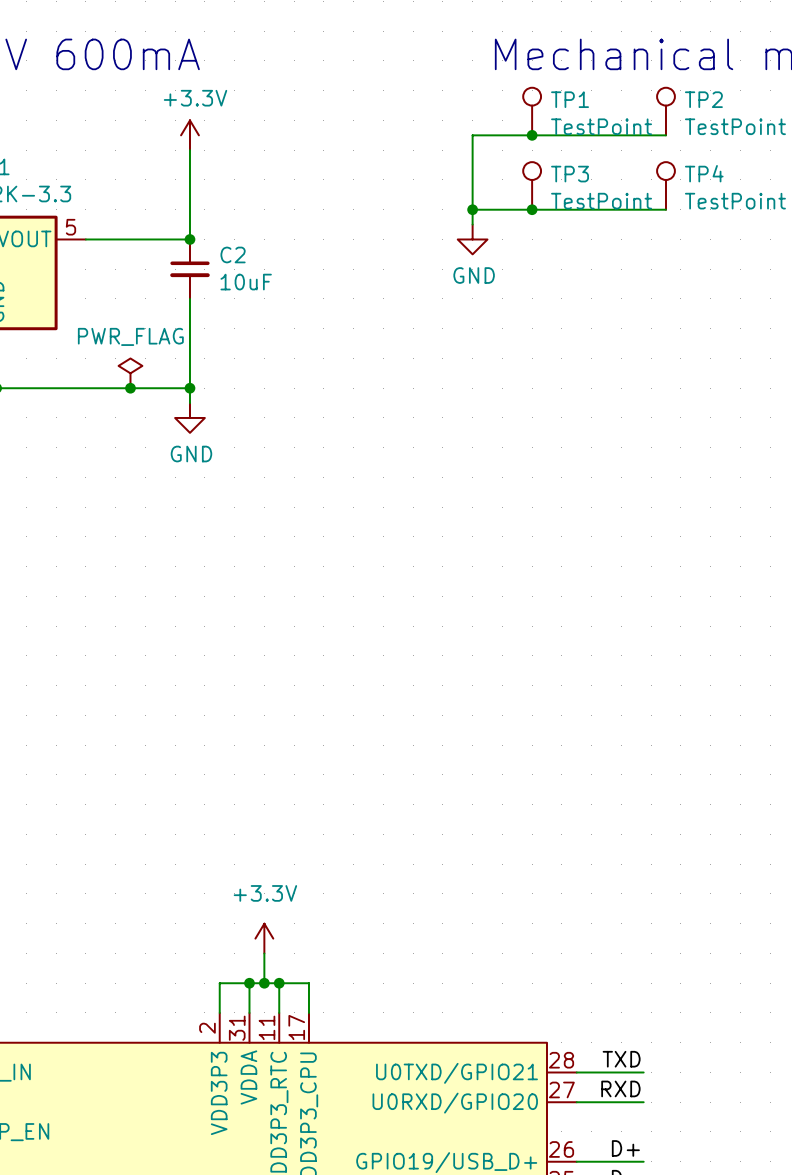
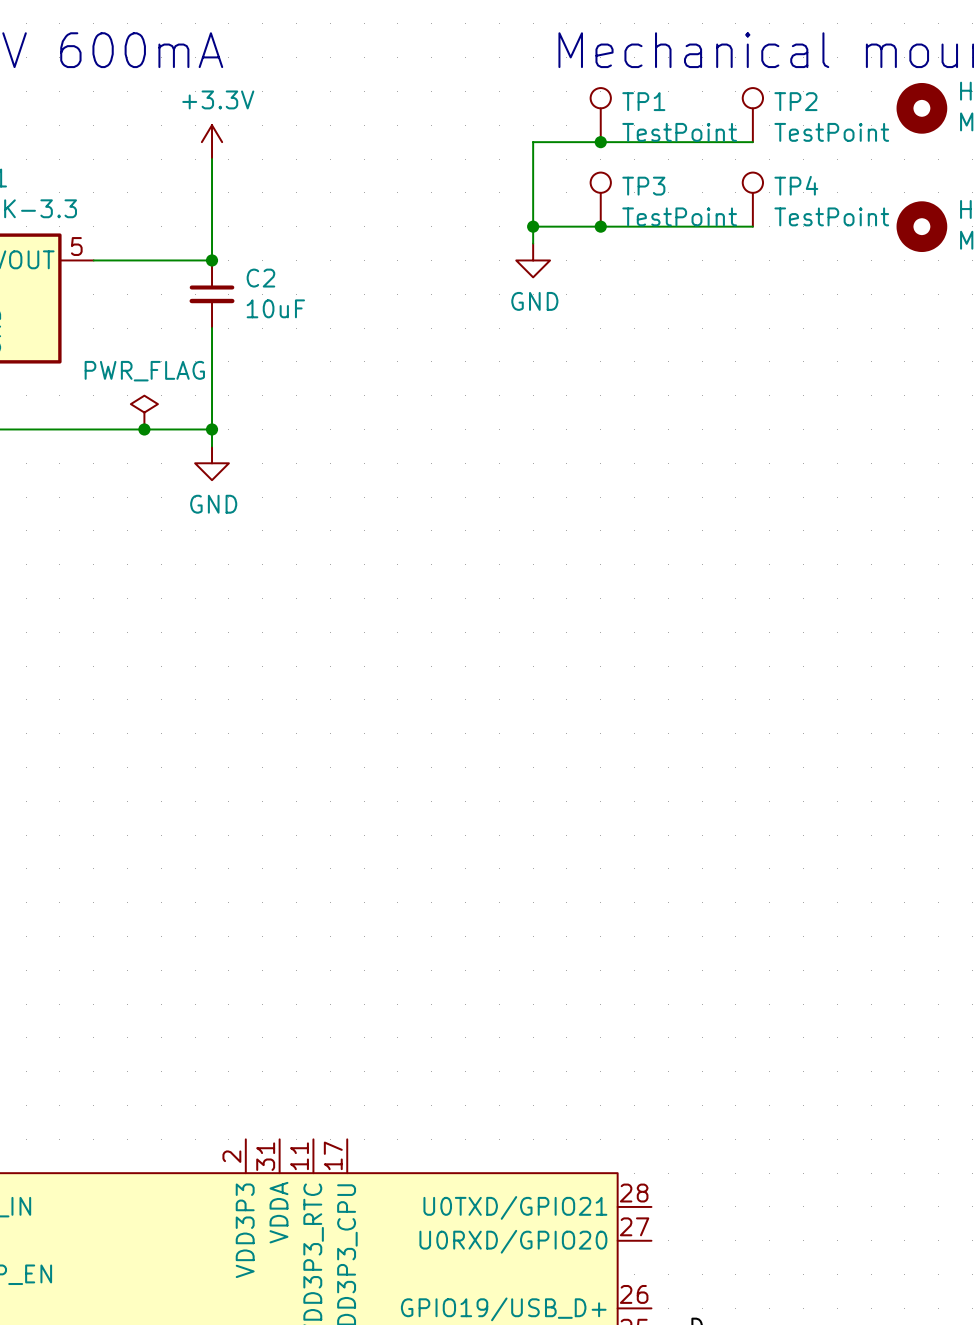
power symbol: +3.3V (264, 938) -> none
wire: (264, 953) (264, 983) -> none
wire: (249, 983) (249, 1012) -> none
junction: (249, 983) -> none
junction: (264, 983) -> none
wire: (279, 983) (279, 1012) -> none
junction: (279, 983) -> none
wire: (219, 1012) (219, 983) (308, 983) (308, 1012) -> none
label: TXD (621, 1059) -> none
wire: (576, 1072) (643, 1072) -> none
label: RXD (620, 1088) -> none
wire: (576, 1102) (643, 1102) -> none
label: D+ (625, 1148) -> none
wire: (576, 1161) (643, 1161) -> none

